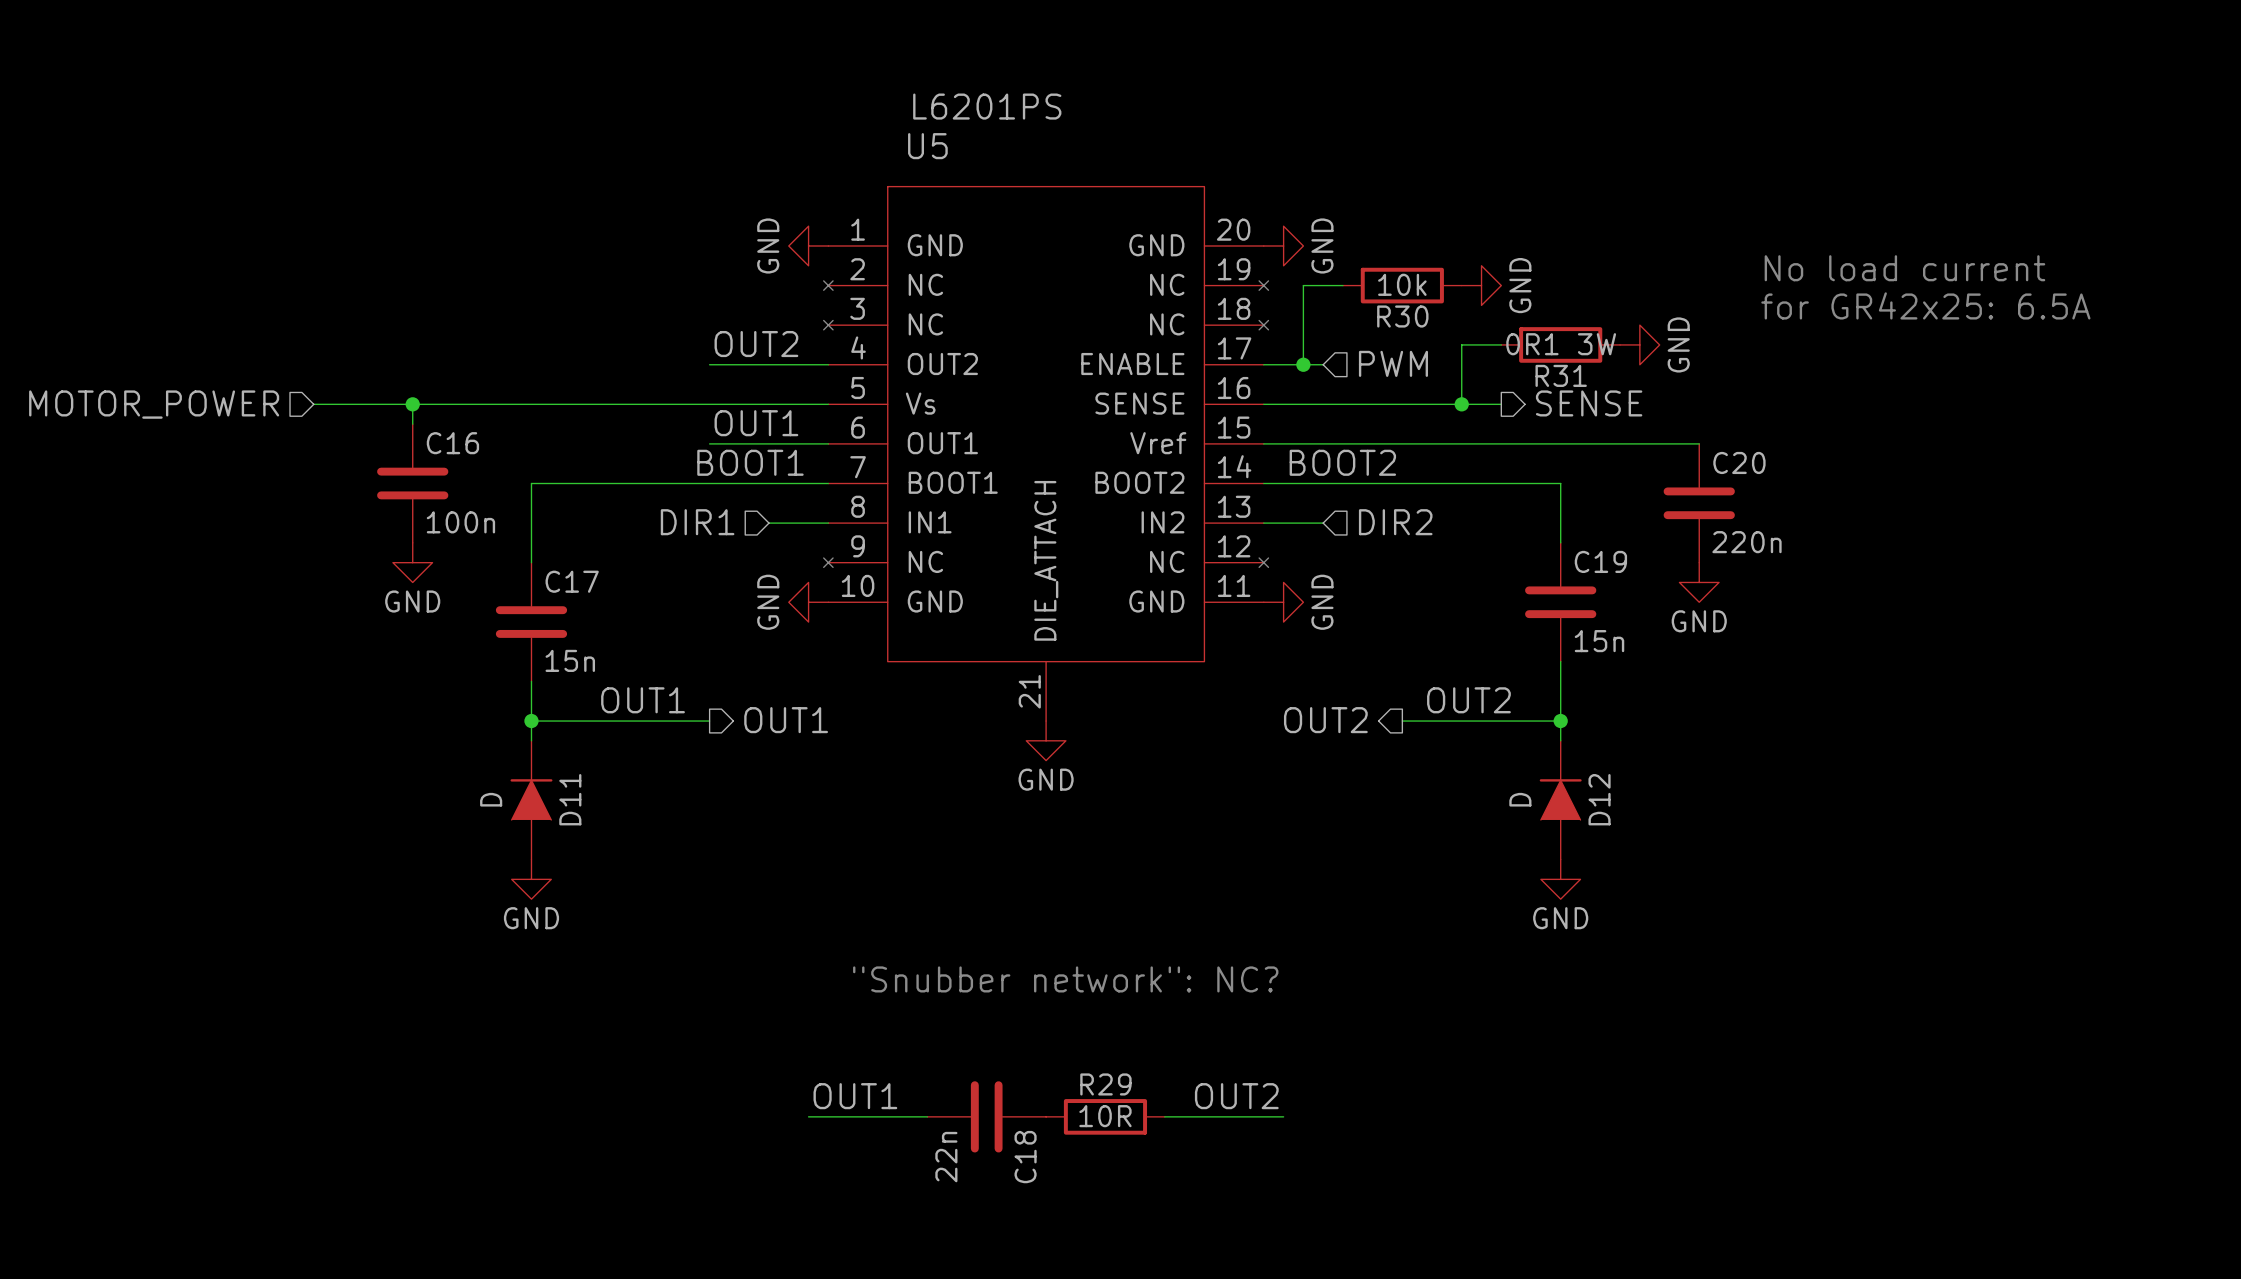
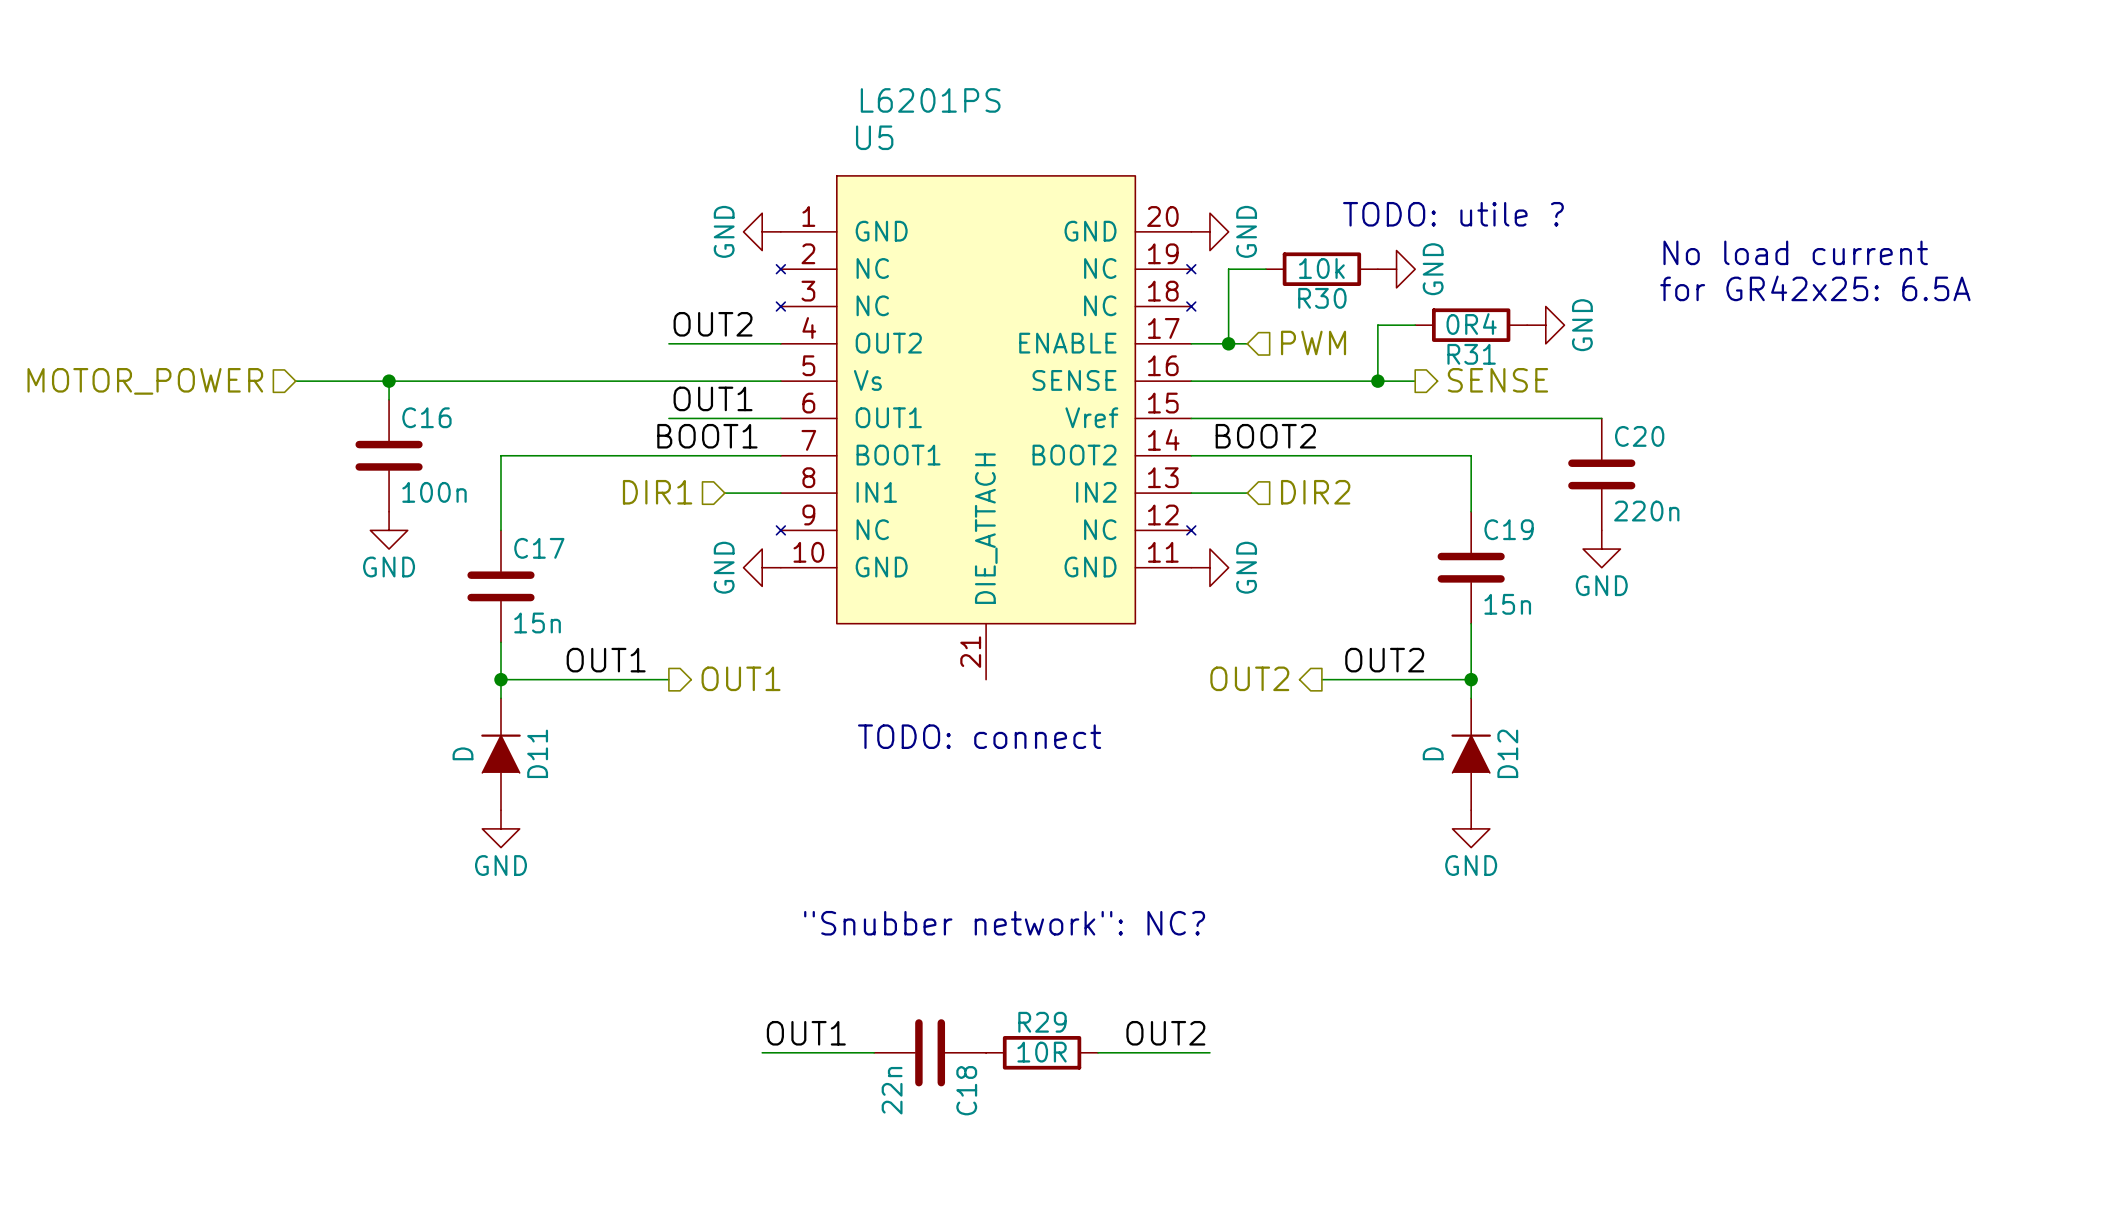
text: none -> TODO: utile ? (1453, 214)
R31 value: 0R1 3W (1561, 344) -> 0R4 (1471, 324)
power symbol: GND (1046, 740) -> none
text: none -> TODO: connect (979, 736)

